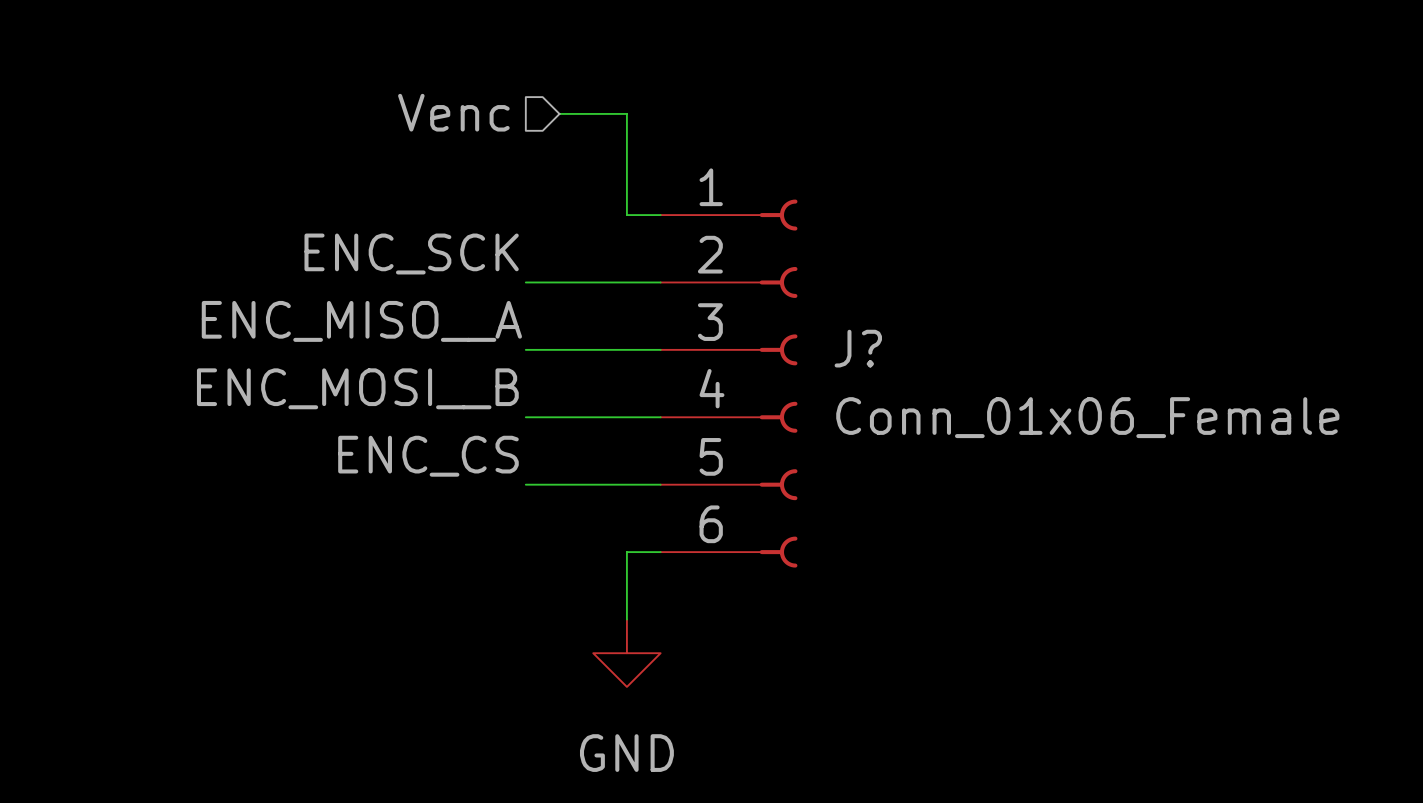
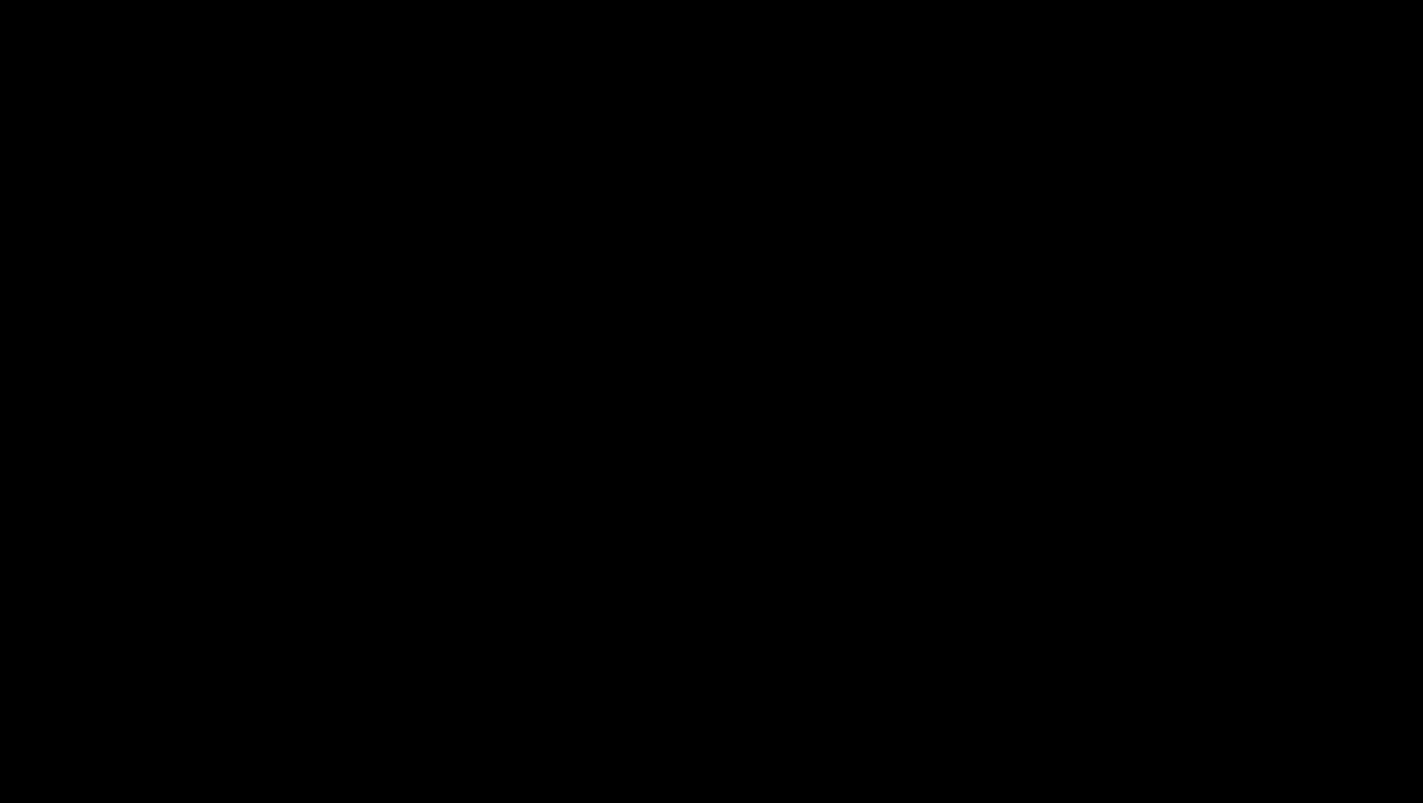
hierarchical label: Venc (453, 112) -> none
wire: (559, 113) (626, 113) (626, 215) (660, 215) -> none
label: ENC_SCK (411, 254) -> none
wire: (525, 282) (660, 282) -> none
label: ENC_MISO__A (361, 321) -> none
wire: (525, 349) (660, 349) -> none
J?: Conn_01x06_Female (729, 383) -> none
label: ENC_MOSI__B (357, 388) -> none
wire: (525, 417) (660, 417) -> none
label: ENC_CS (428, 456) -> none
wire: (525, 484) (660, 484) -> none
wire: (660, 552) (626, 552) (626, 619) -> none
power symbol: GND (626, 653) -> none

